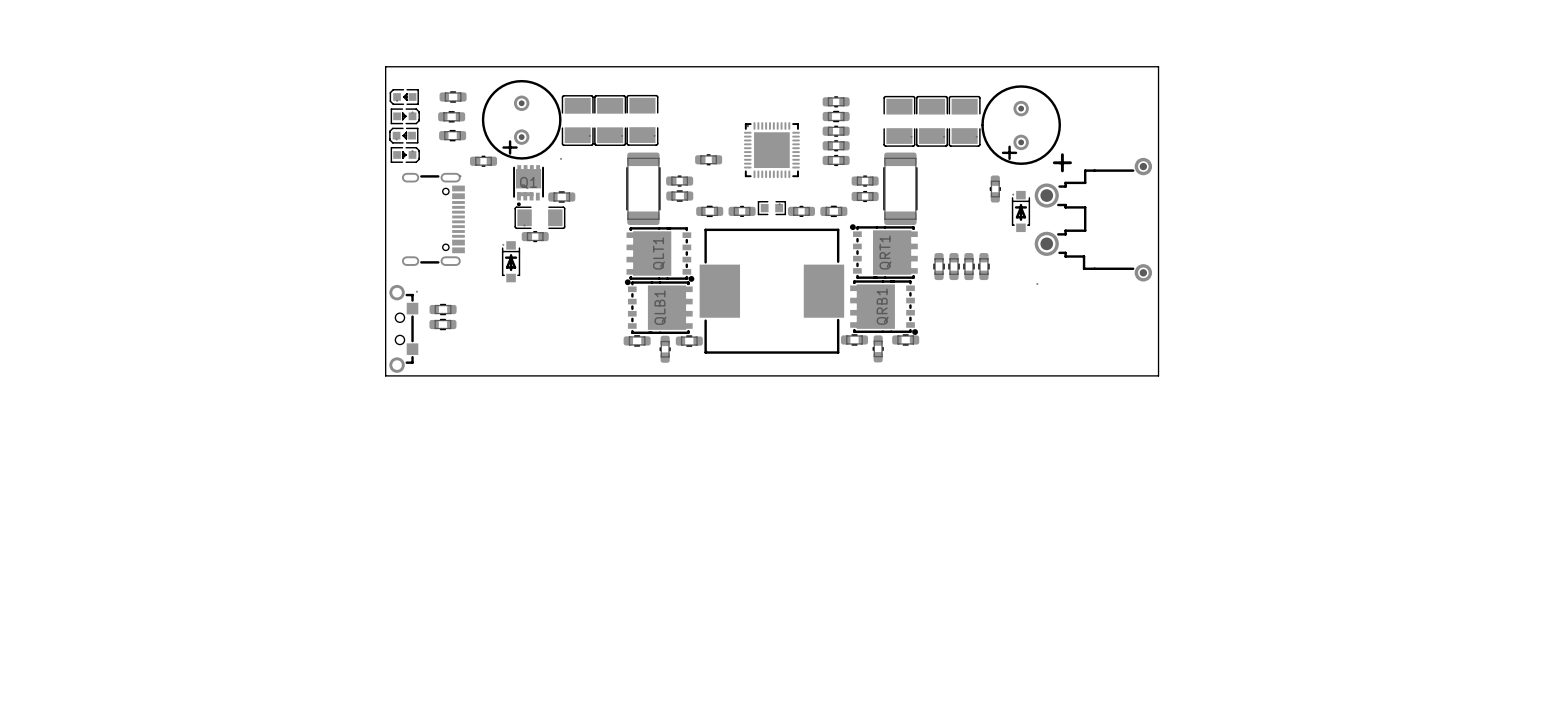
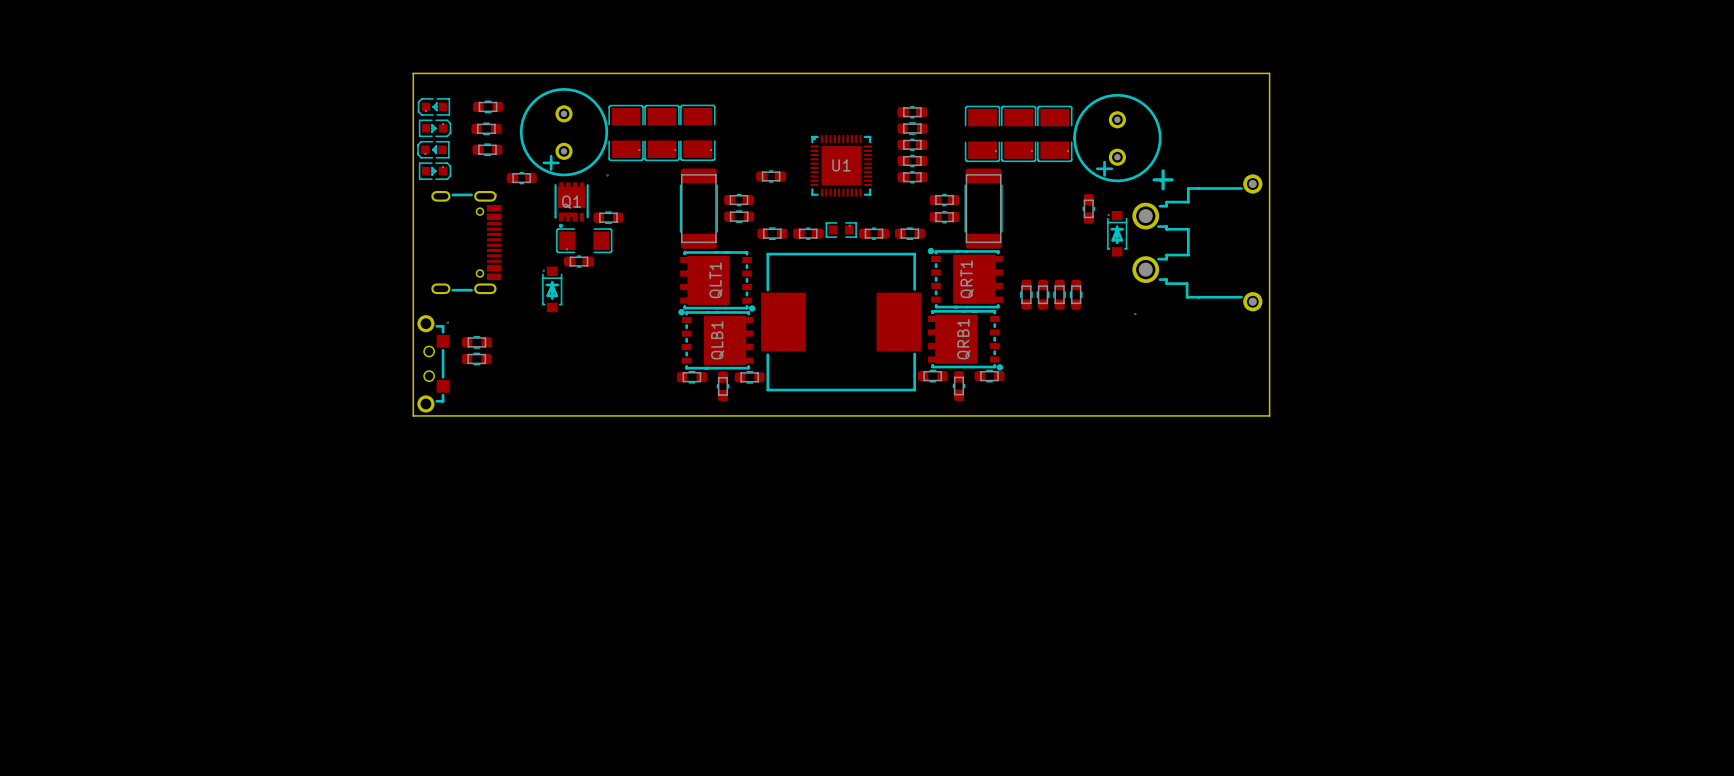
U1 name: none -> U1 (841, 165)

